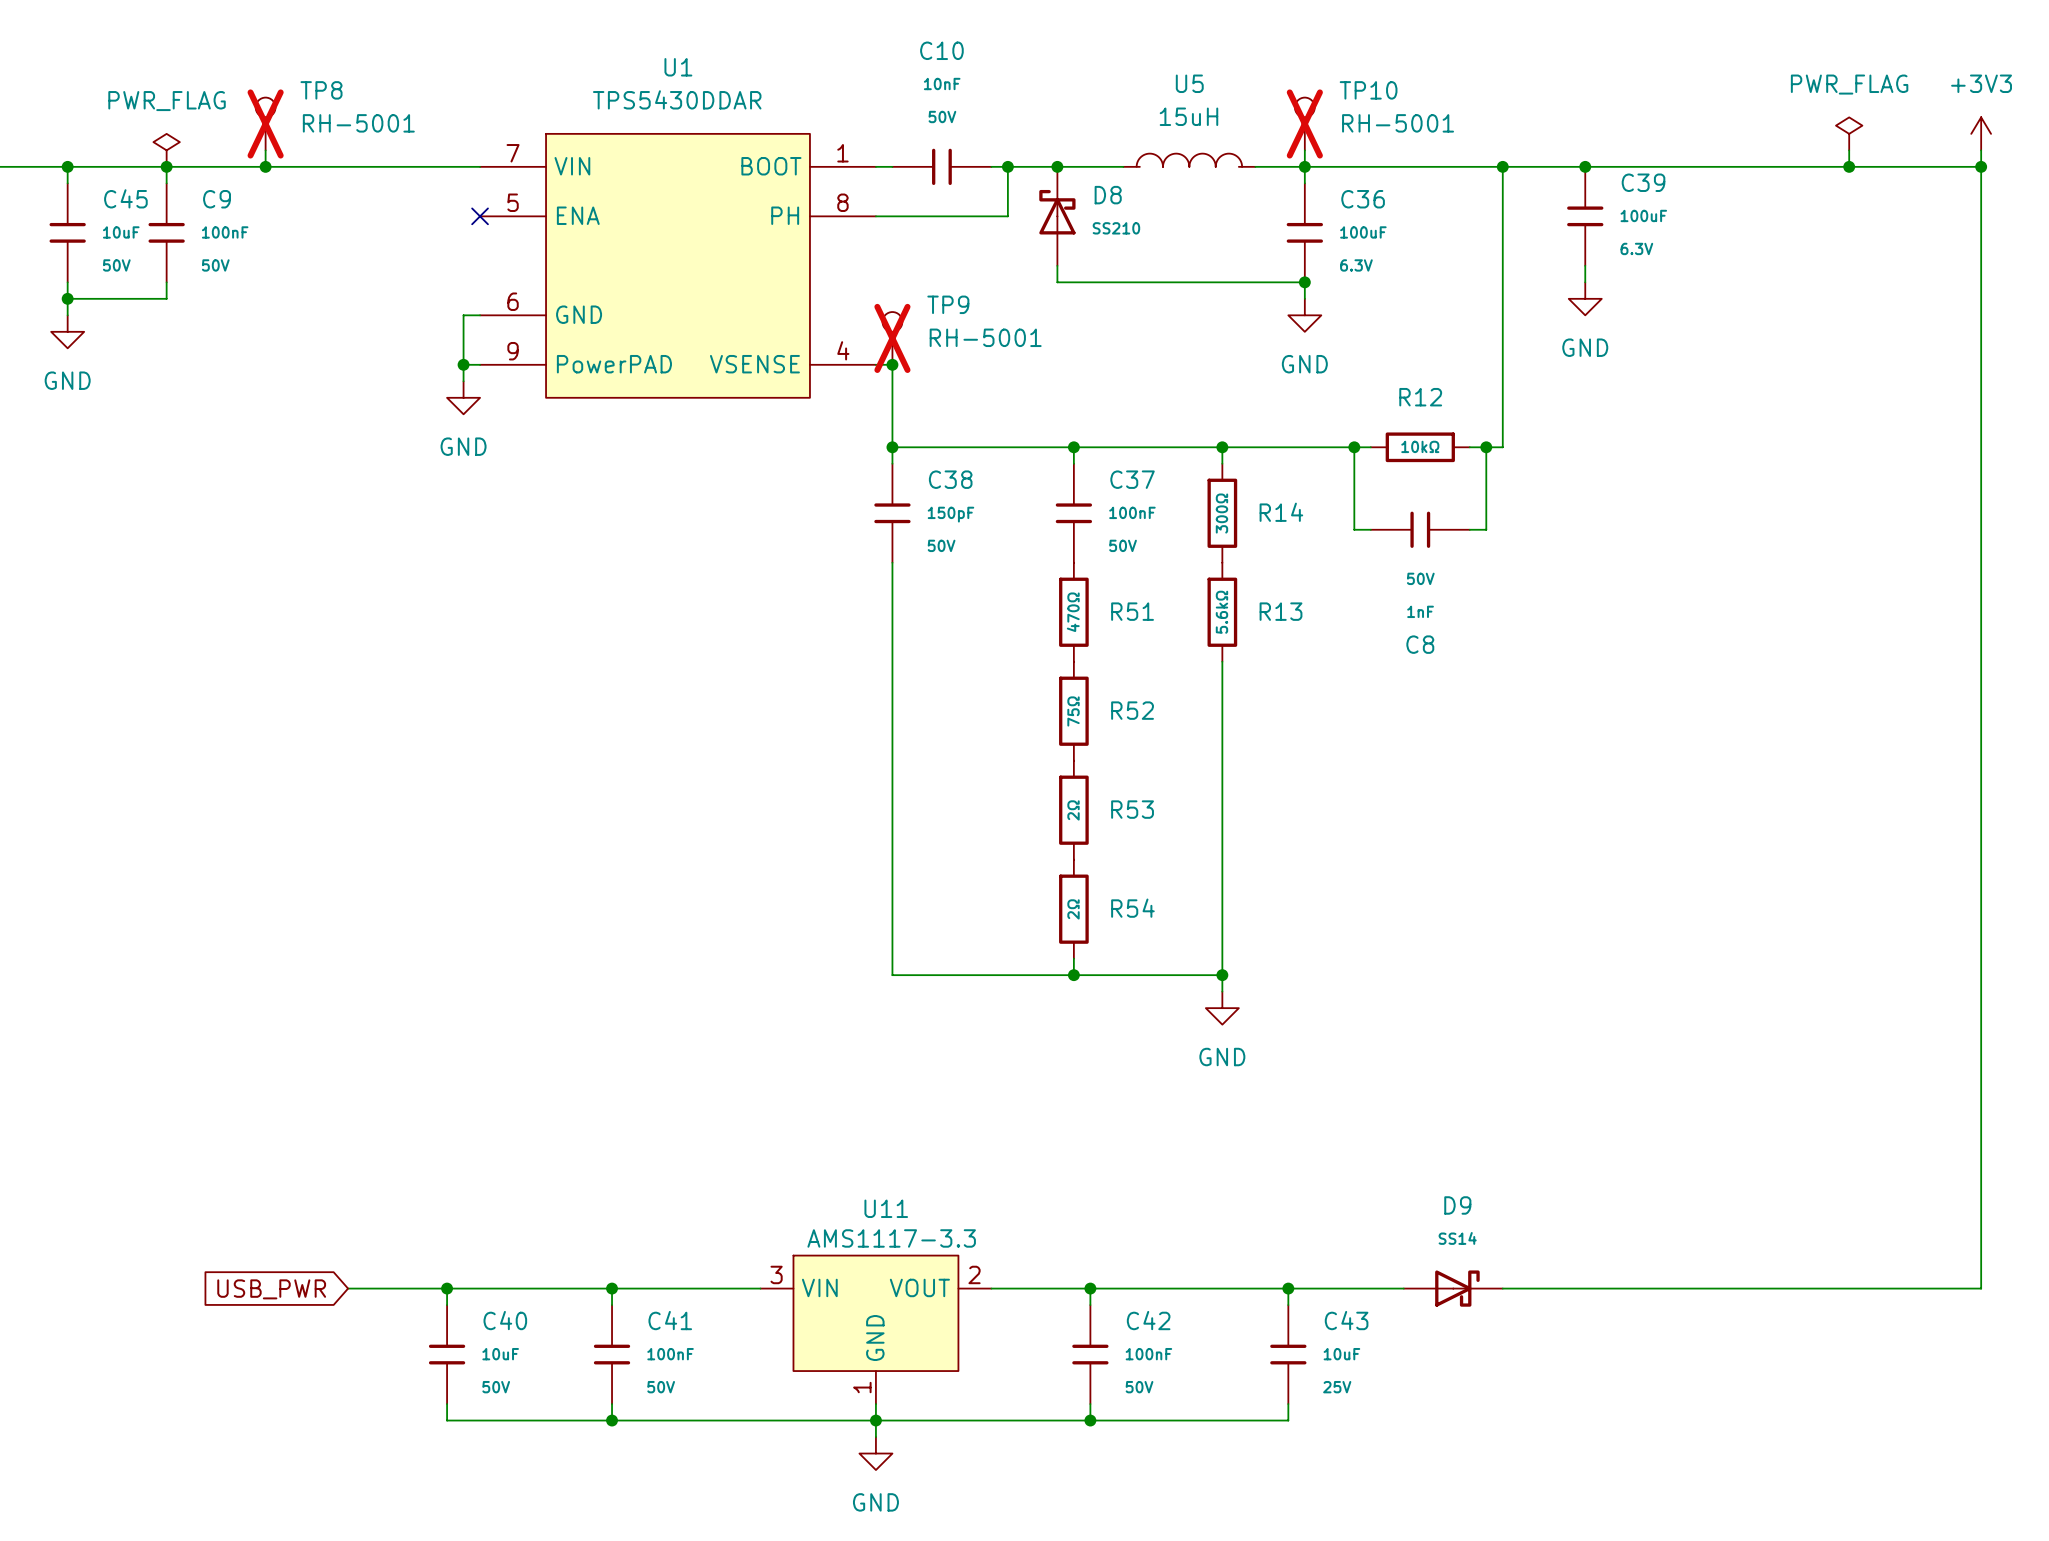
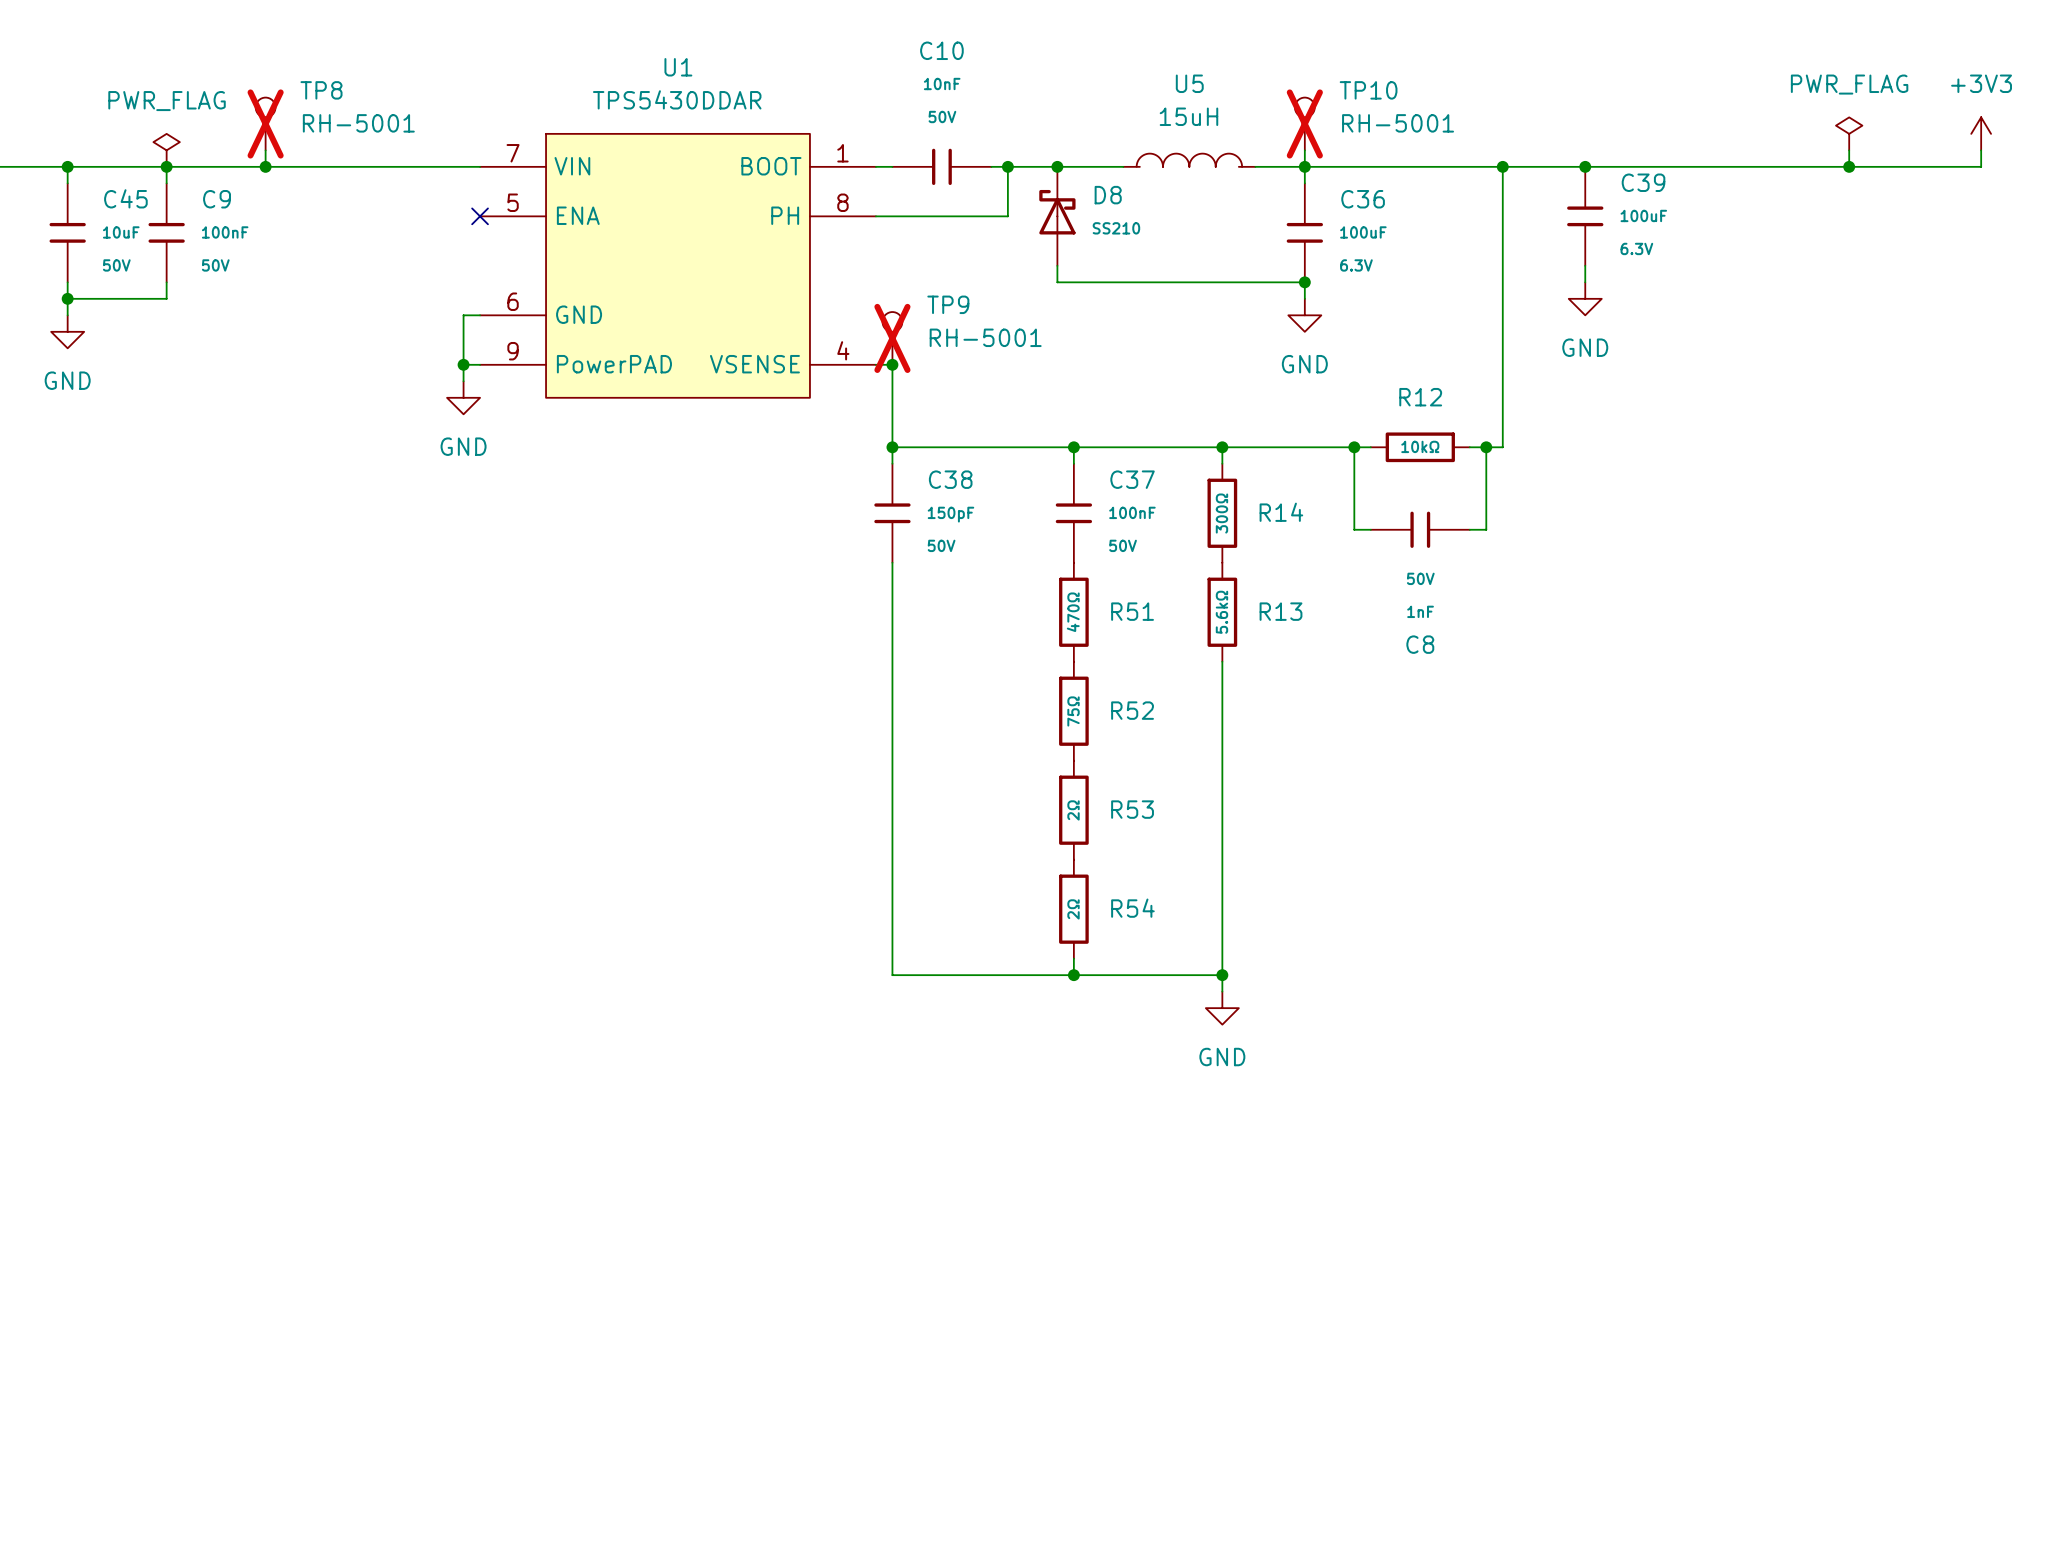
wire: (1981, 166) (1981, 1288) (1502, 1288) -> none
junction: (1981, 166) -> none
wire: (348, 1288) (760, 1288) -> none
wire: (447, 1288) (447, 1305) -> none
junction: (447, 1288) -> none
wire: (612, 1288) (612, 1305) -> none
junction: (612, 1288) -> none
wire: (991, 1288) (1403, 1288) -> none
wire: (1090, 1288) (1090, 1305) -> none
junction: (1090, 1288) -> none
wire: (1288, 1288) (1288, 1305) -> none
junction: (1288, 1288) -> none
D9: SS14 (1453, 1288) -> none
global label: USB_PWR (271, 1289) -> none
U11: AMS1117-3.3 (875, 1329) -> none
C40: 10uF (447, 1354) -> none
C41: 100nF (612, 1354) -> none
C42: 100nF (1090, 1354) -> none
C43: 10uF (1288, 1354) -> none
wire: (447, 1404) (447, 1420) (1288, 1420) (1288, 1404) -> none
wire: (612, 1404) (612, 1420) -> none
wire: (875, 1404) (875, 1437) -> none
wire: (1090, 1404) (1090, 1420) -> none
junction: (612, 1420) -> none
junction: (875, 1420) -> none
junction: (1090, 1420) -> none
power symbol: GND (875, 1453) -> none

